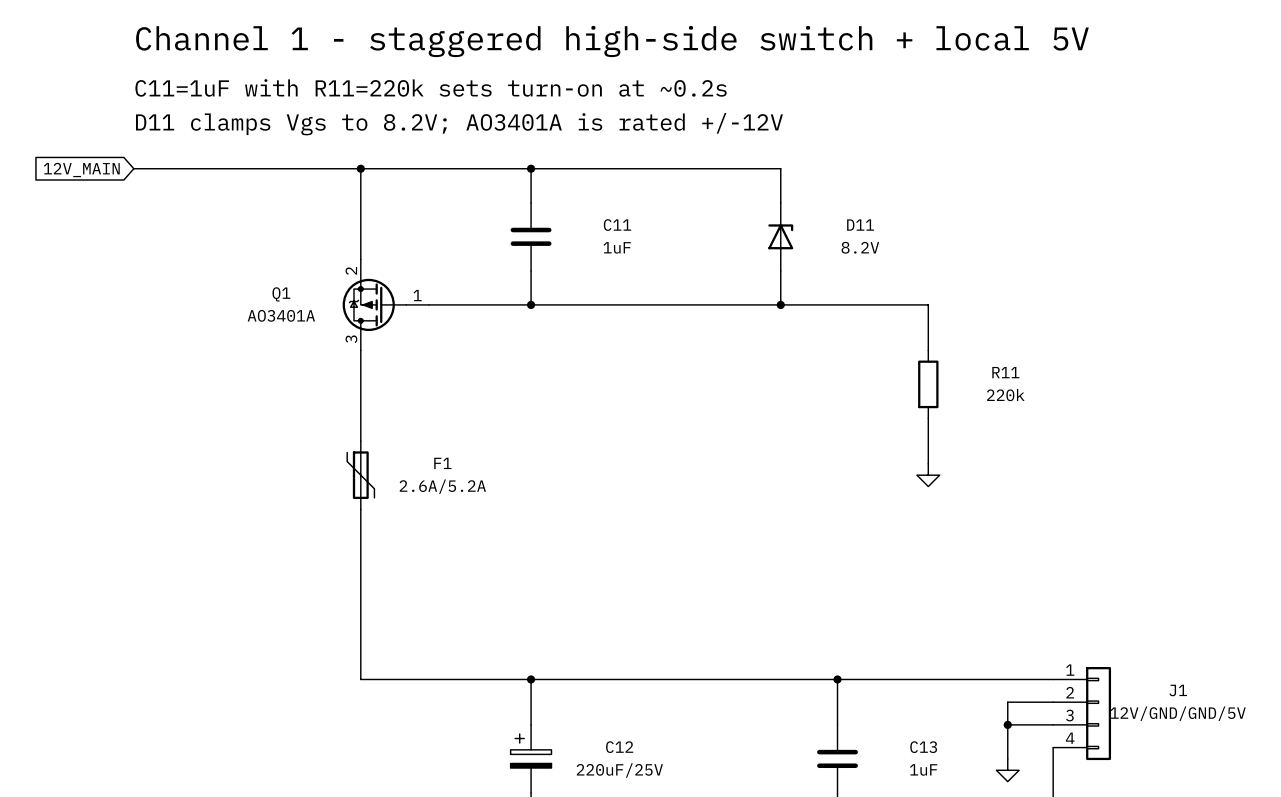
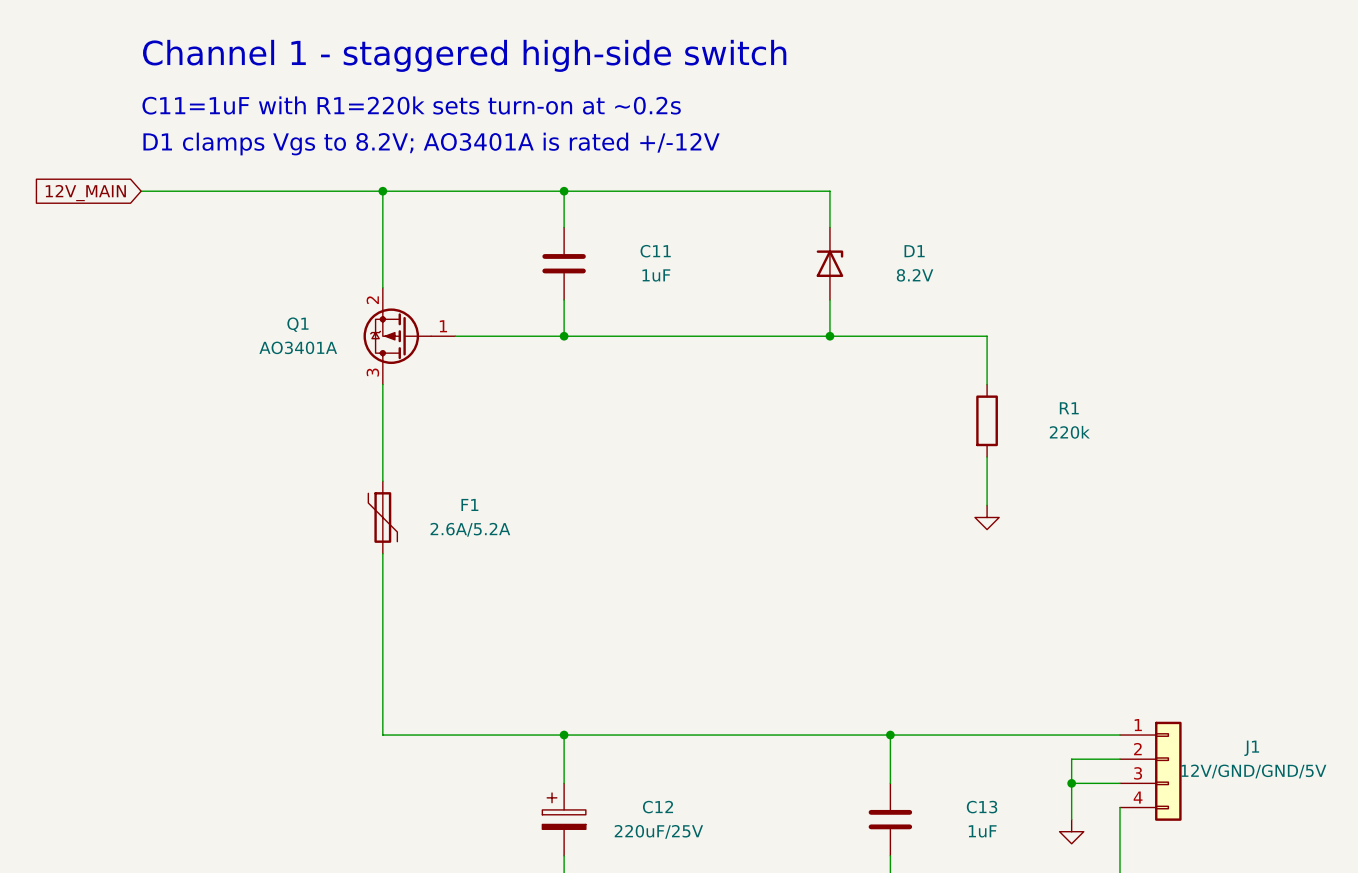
text: Channel 1 - staggered high-side switch + local 5V (612, 41) -> Channel 1 - staggered high-side switch (464, 55)
text: C11=1uF with R11=220k sets turn-on at ~0.2s (431, 87) -> C11=1uF with R1=220k sets turn-on at ~0.2s (411, 105)
text: D11 clamps Vgs to 8.2V; AO3401A is rated +/-12V (459, 124) -> D1 clamps Vgs to 8.2V; AO3401A is rated +/-12V (431, 144)
D11 name: D11 (860, 225) -> D1 (914, 251)
R11 name: R11 (1005, 372) -> R1 (1069, 408)

